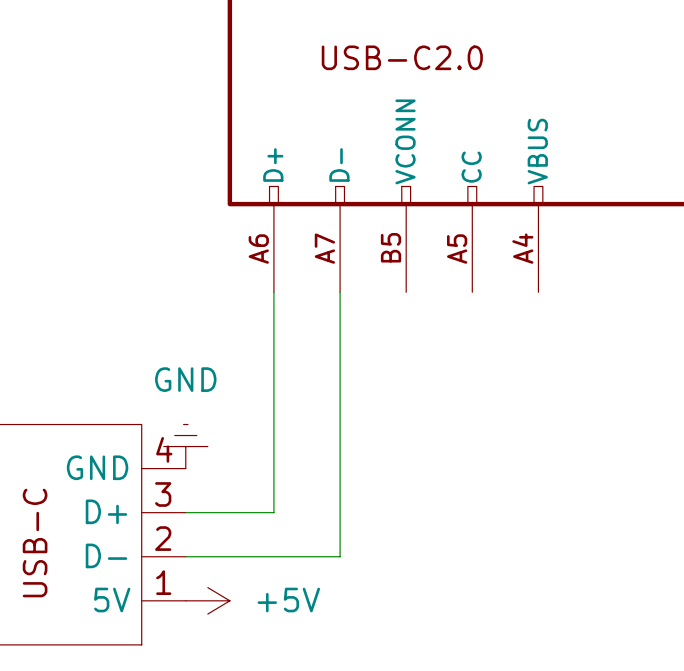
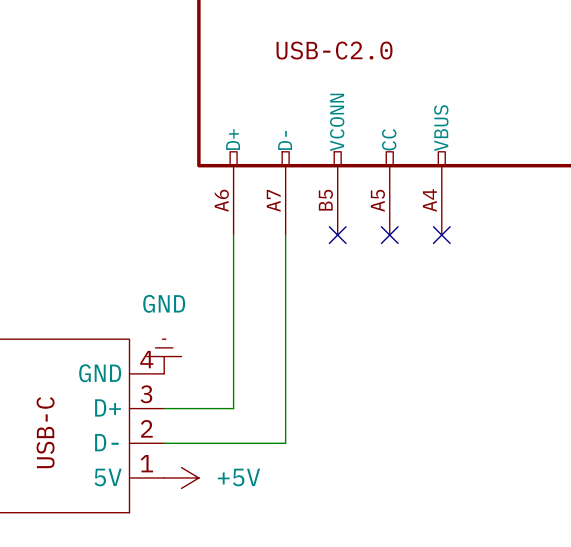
no-connect mark: none -> (337, 235)
no-connect mark: none -> (389, 235)
no-connect mark: none -> (441, 235)

